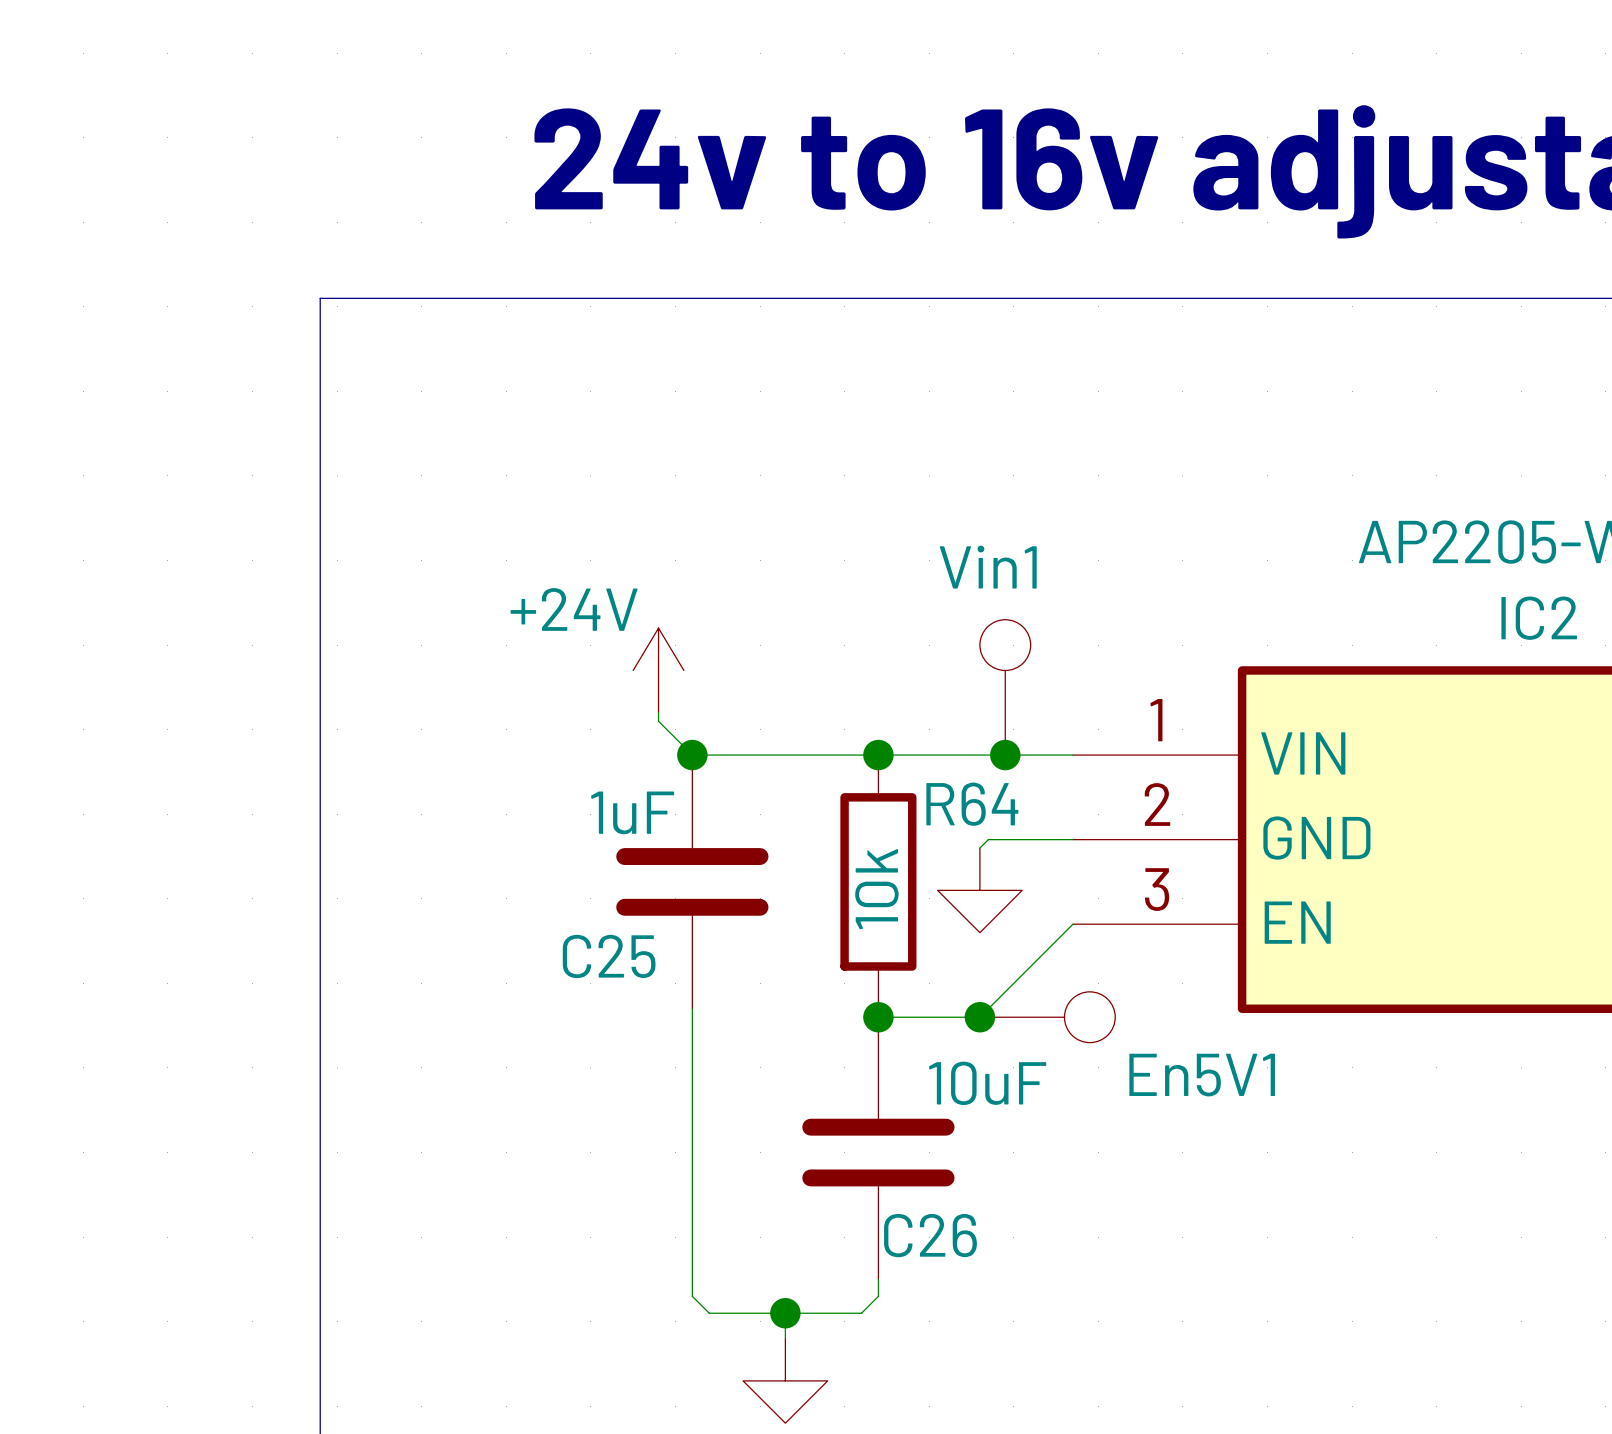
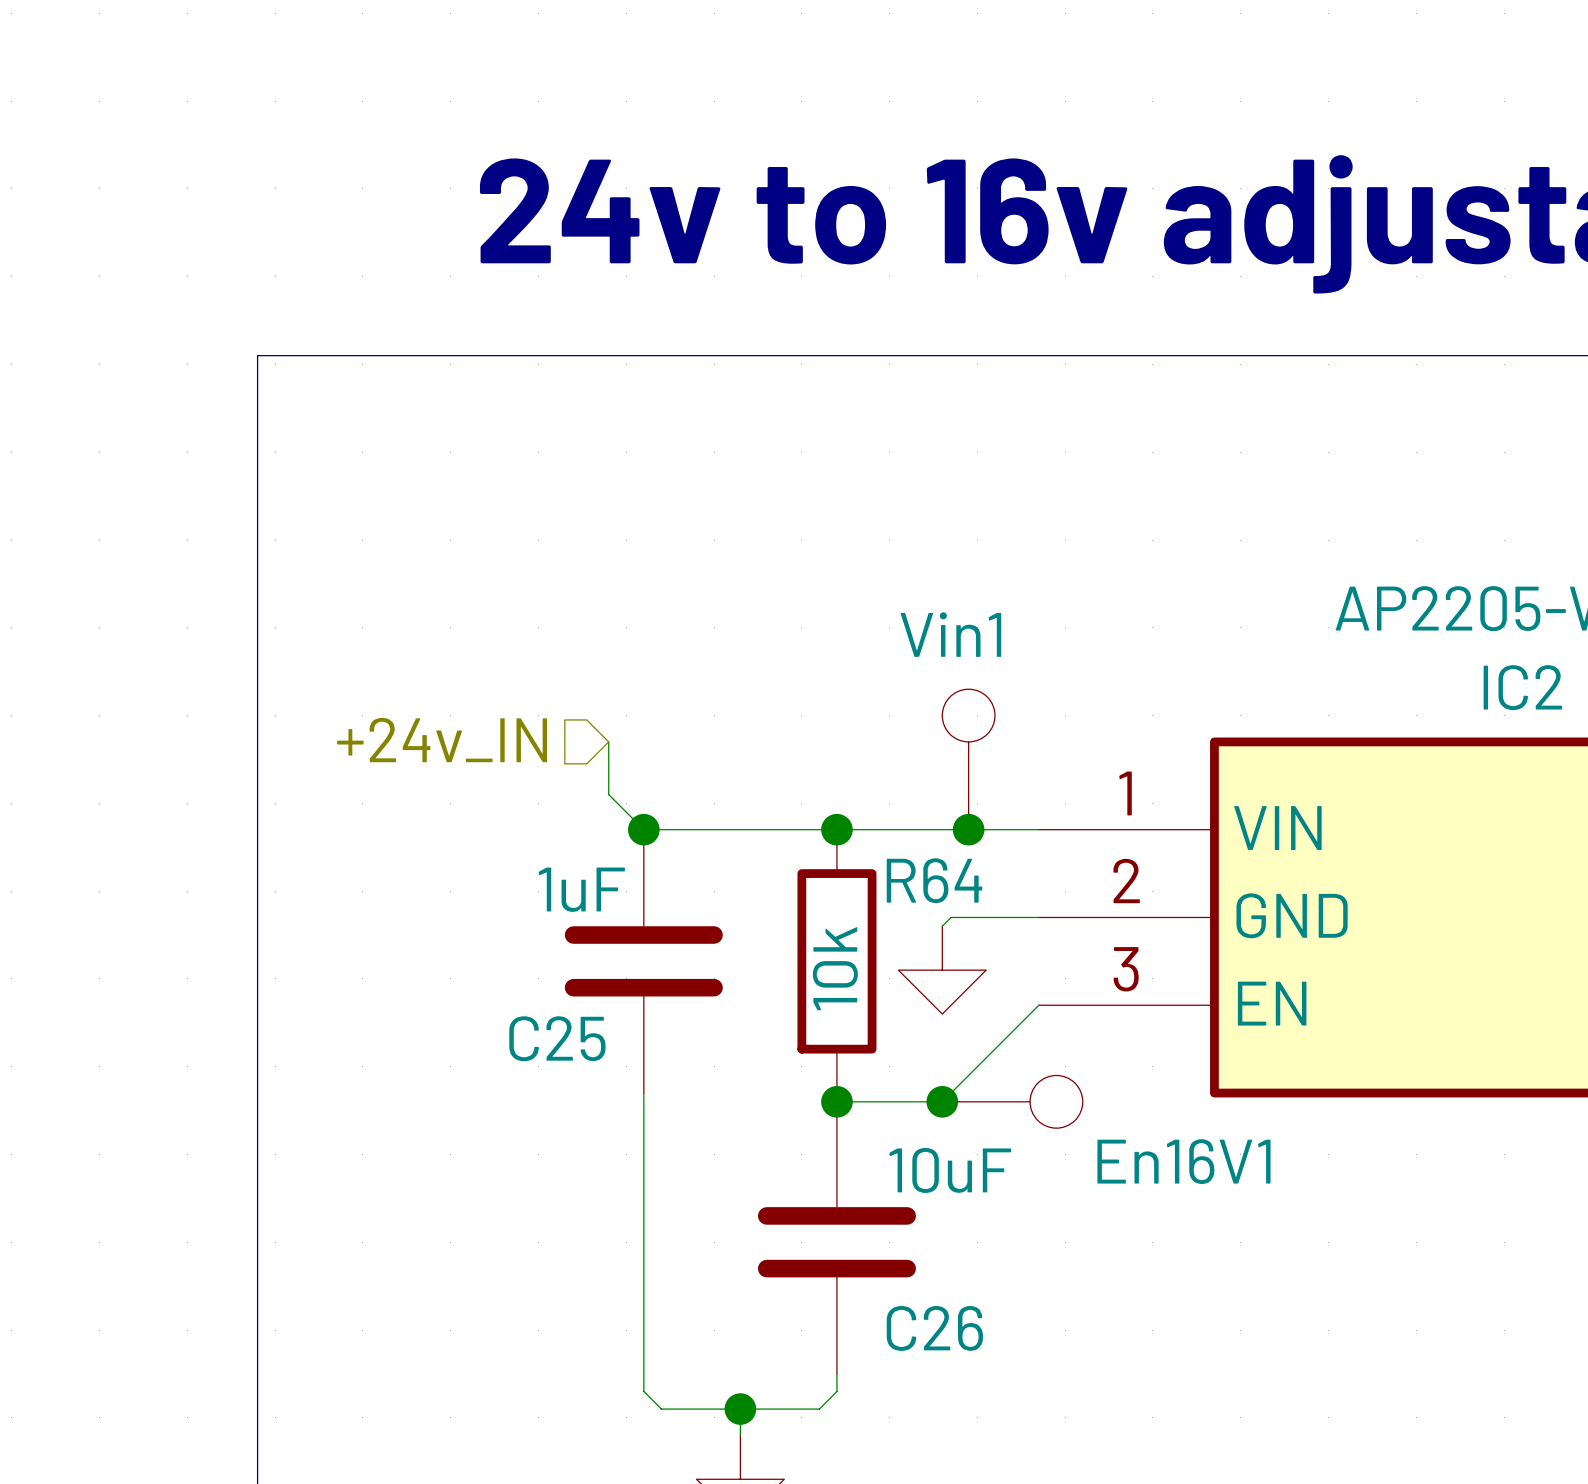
hierarchical label: none -> +24v_IN (442, 740)
power symbol: +24V (658, 670) -> none
En5V1 name: En5V1 (1202, 1075) -> En16V1 (1183, 1161)
C26 name position: C26 (930, 1235) -> C26 (934, 1328)

